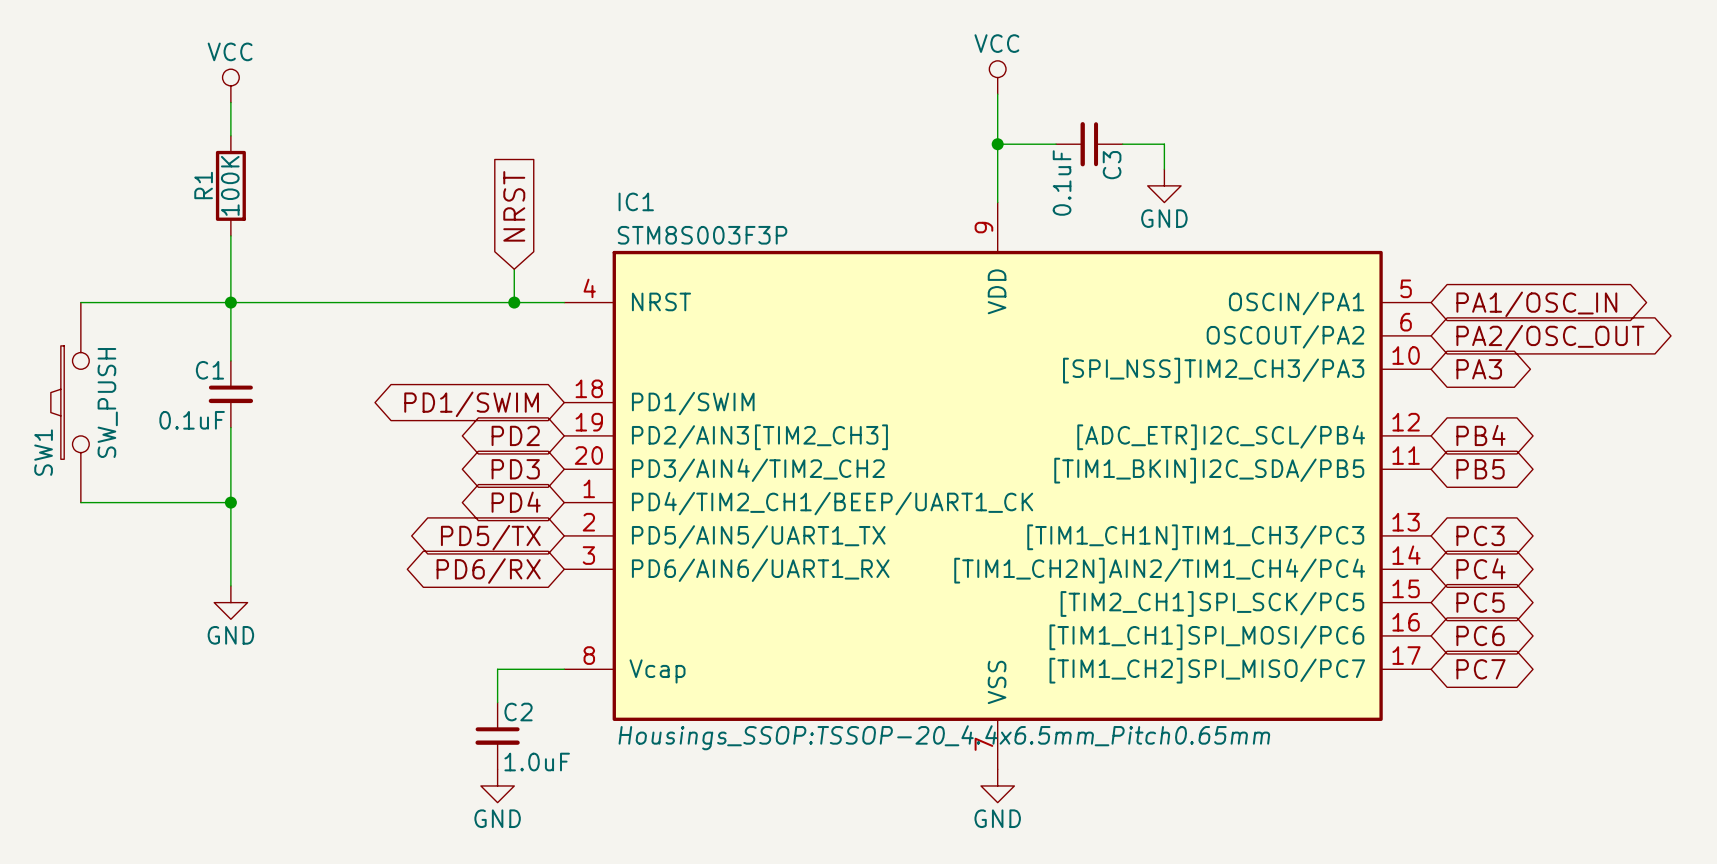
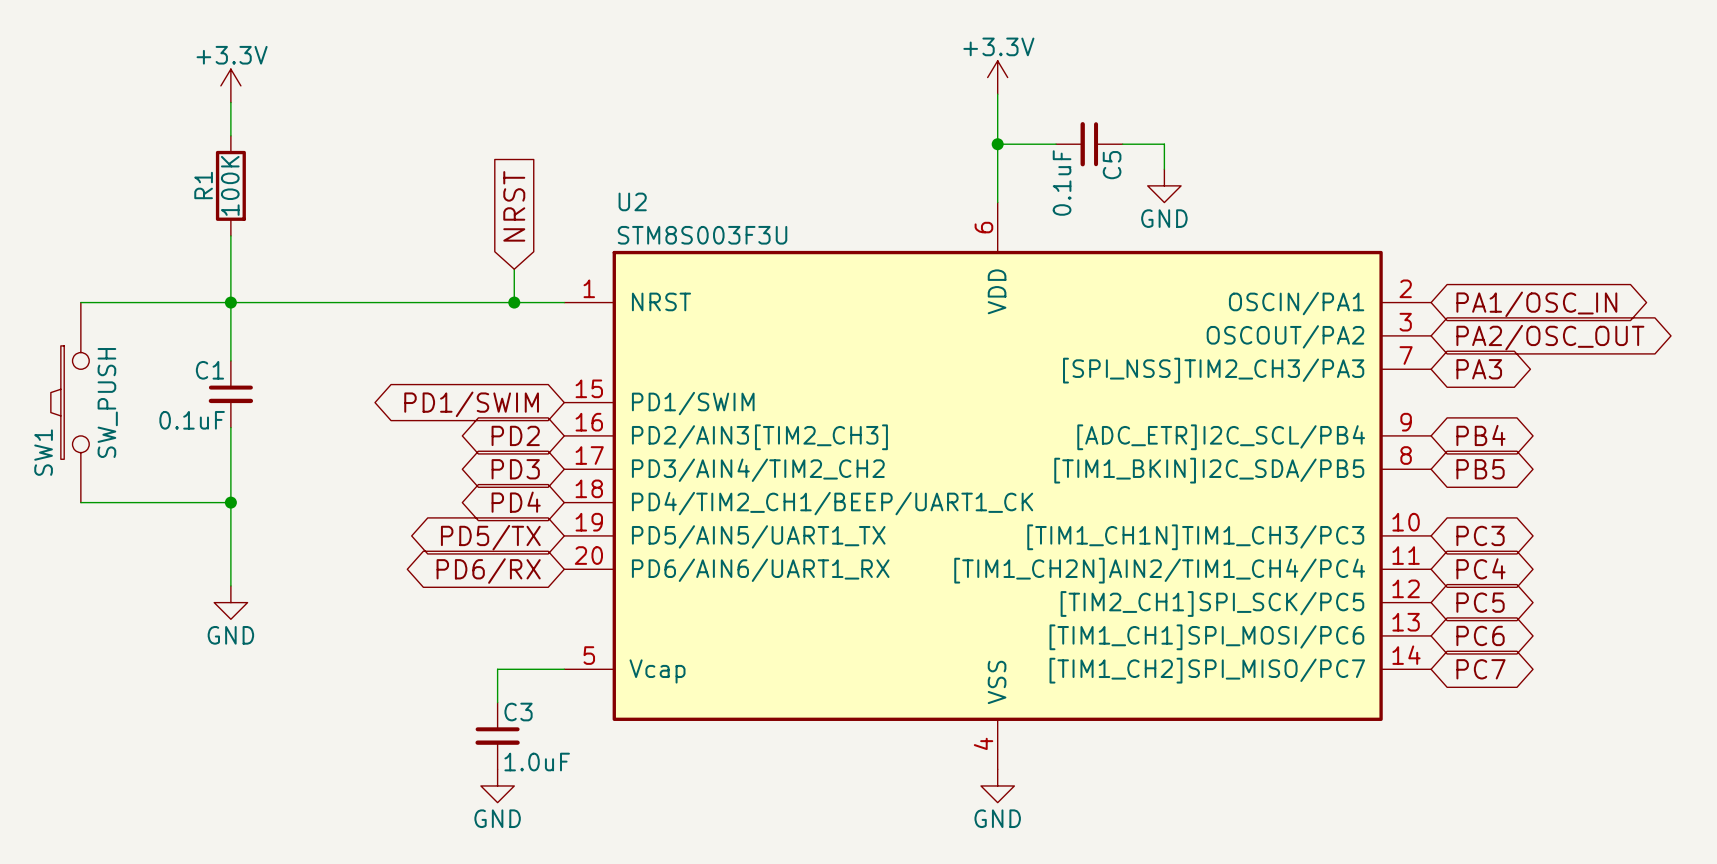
power symbol: VCC (997, 77) -> +3.3V (997, 77)
power symbol: VCC (230, 85) -> +3.3V (230, 85)
C3 name: C3 (1112, 165) -> C5 (1112, 165)
IC1 name: IC1 (636, 201) -> U2 (632, 201)
IC1 symbol: [564, 202, 1432, 770] -> [564, 202, 1432, 770]
IC1 value: STM8S003F3P (702, 235) -> STM8S003F3U (702, 235)
C2 name: C2 (518, 712) -> C3 (518, 712)
IC1 text: Housings_SSOP:TSSOP-20_4.4x6.5mm_Pitch0.65mm (944, 737) -> none

